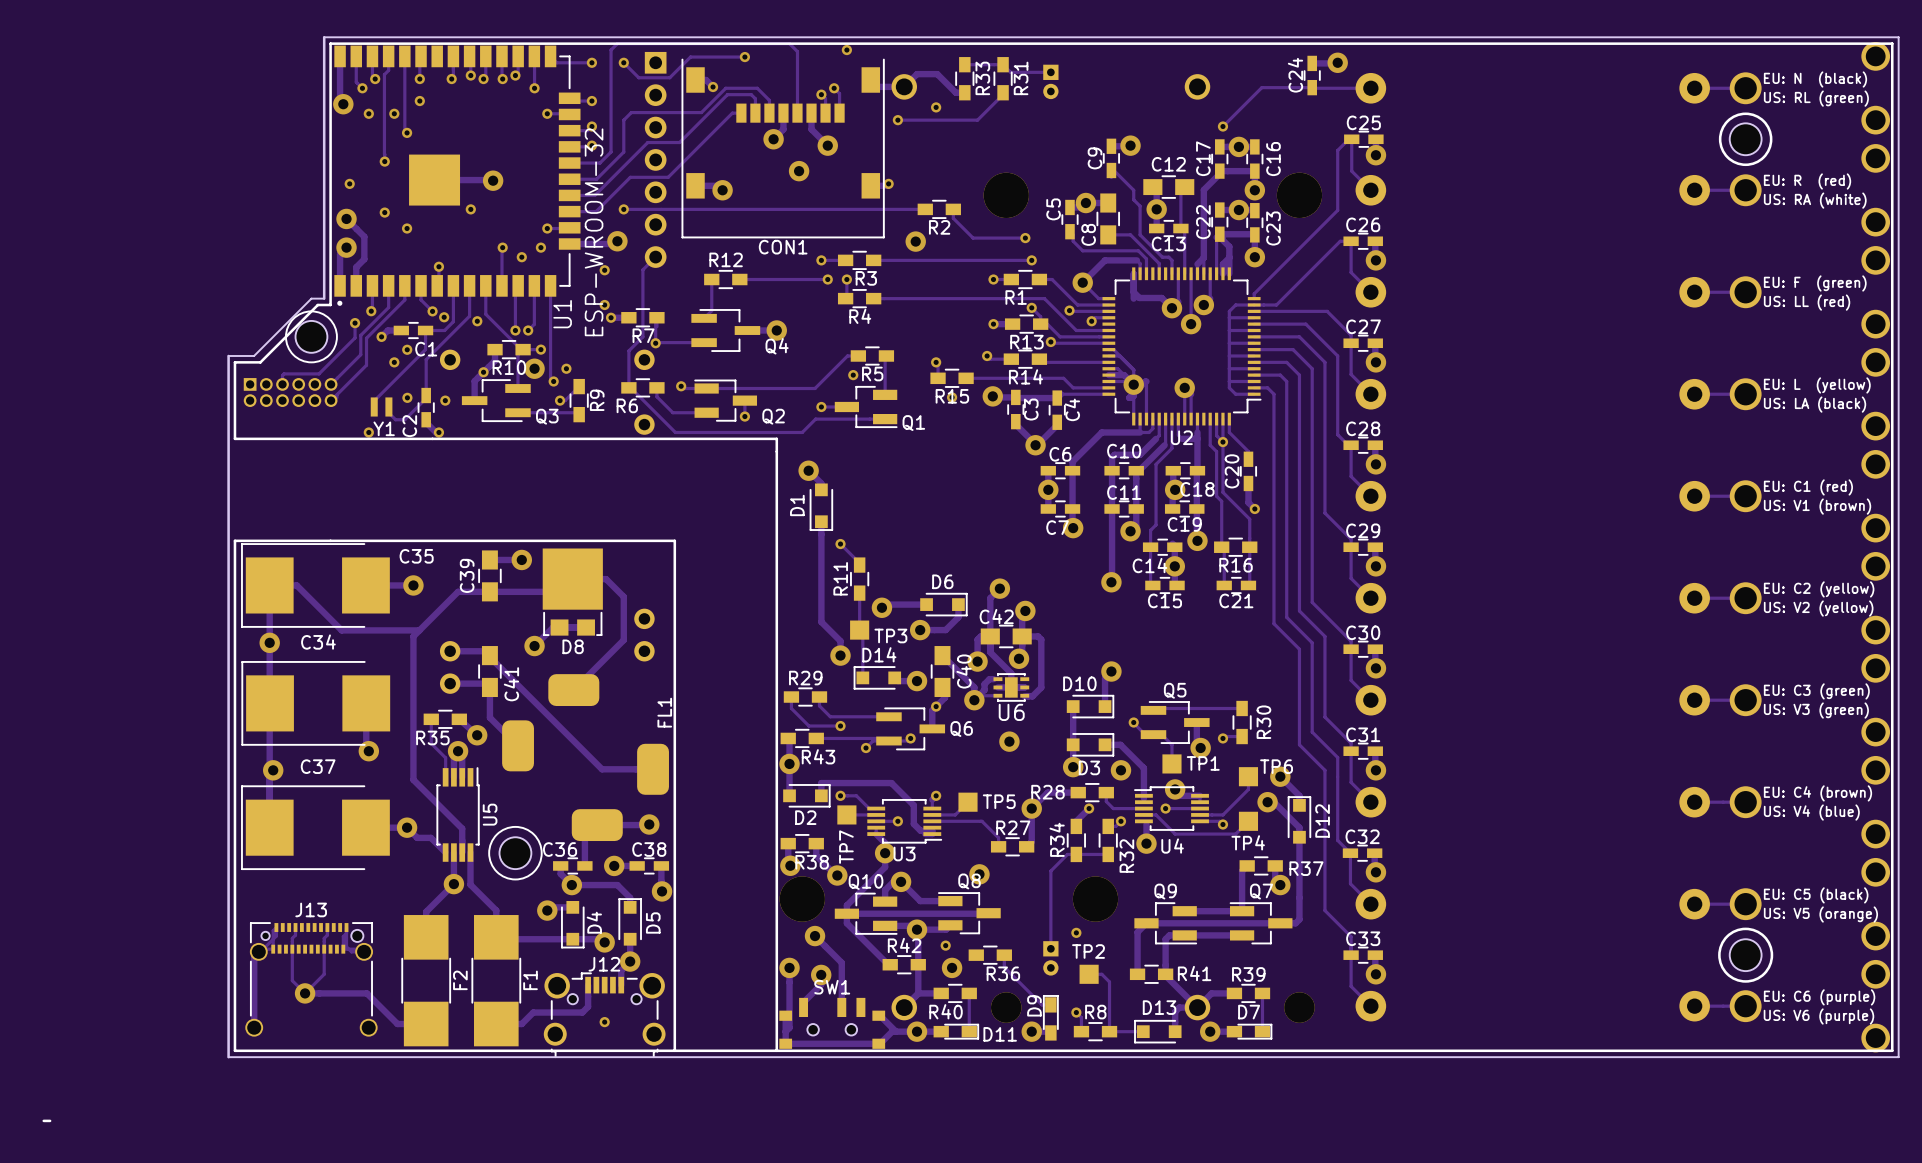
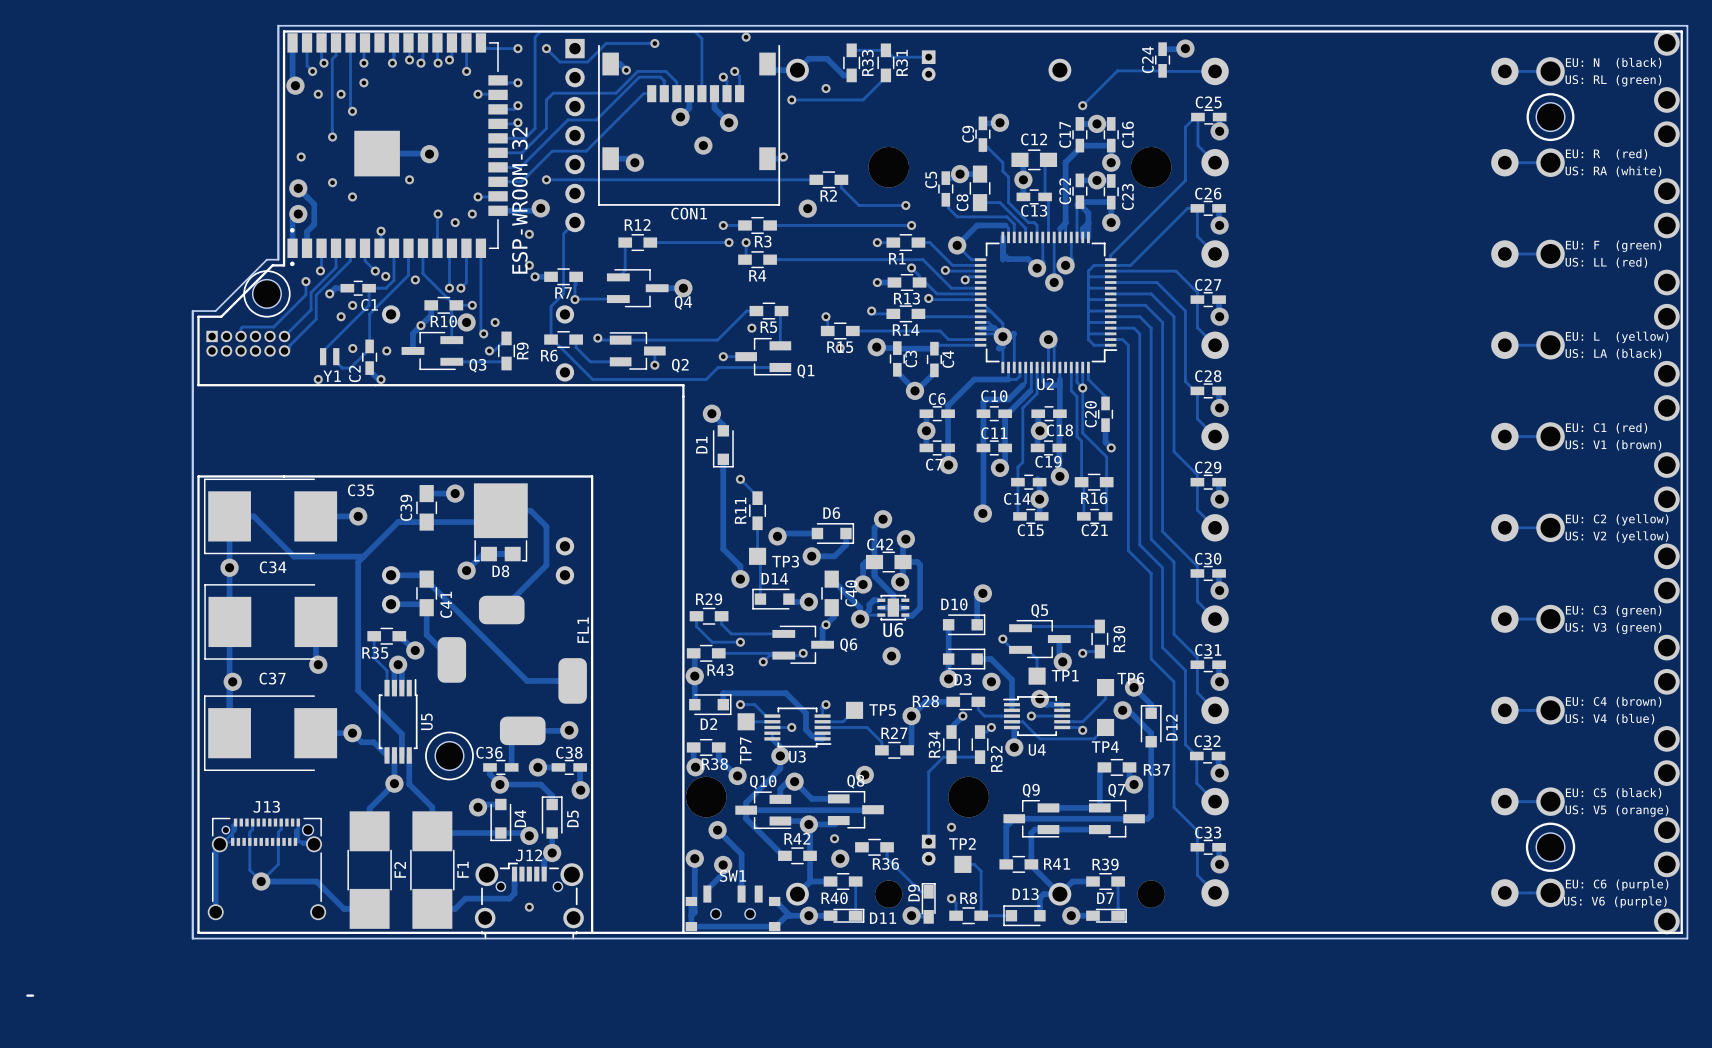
U1: ESP-WROOM-32 (457, 175) -> none
part: none -> ESP-WROOM-32 (397, 149)

